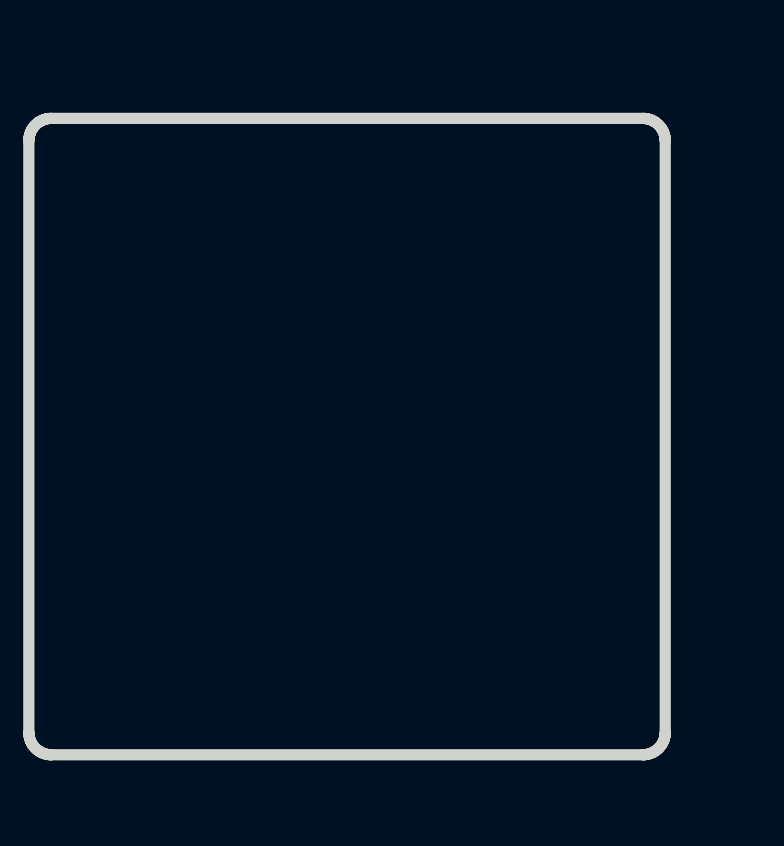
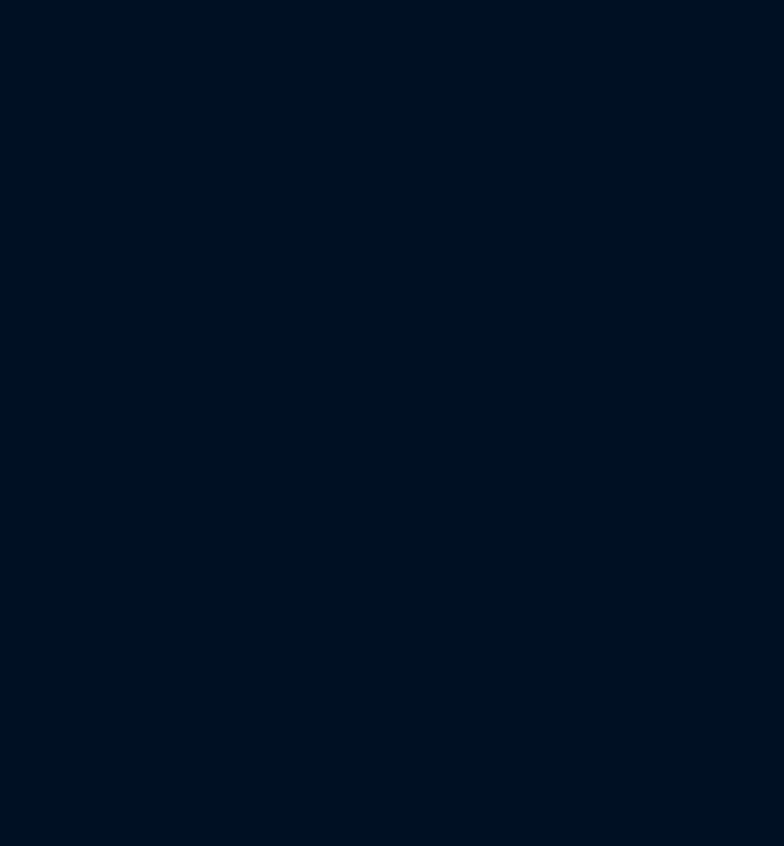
board edge: (48, 118) (34, 125) (30, 133) (28, 140) (28, 732) (30, 741) (35, 748) (42, 753) (51, 754) (642, 754) (651, 753) (658, 748) (663, 741) (665, 732) (665, 140) (663, 132) (658, 124) (651, 120) (642, 118) (48, 118) -> none

